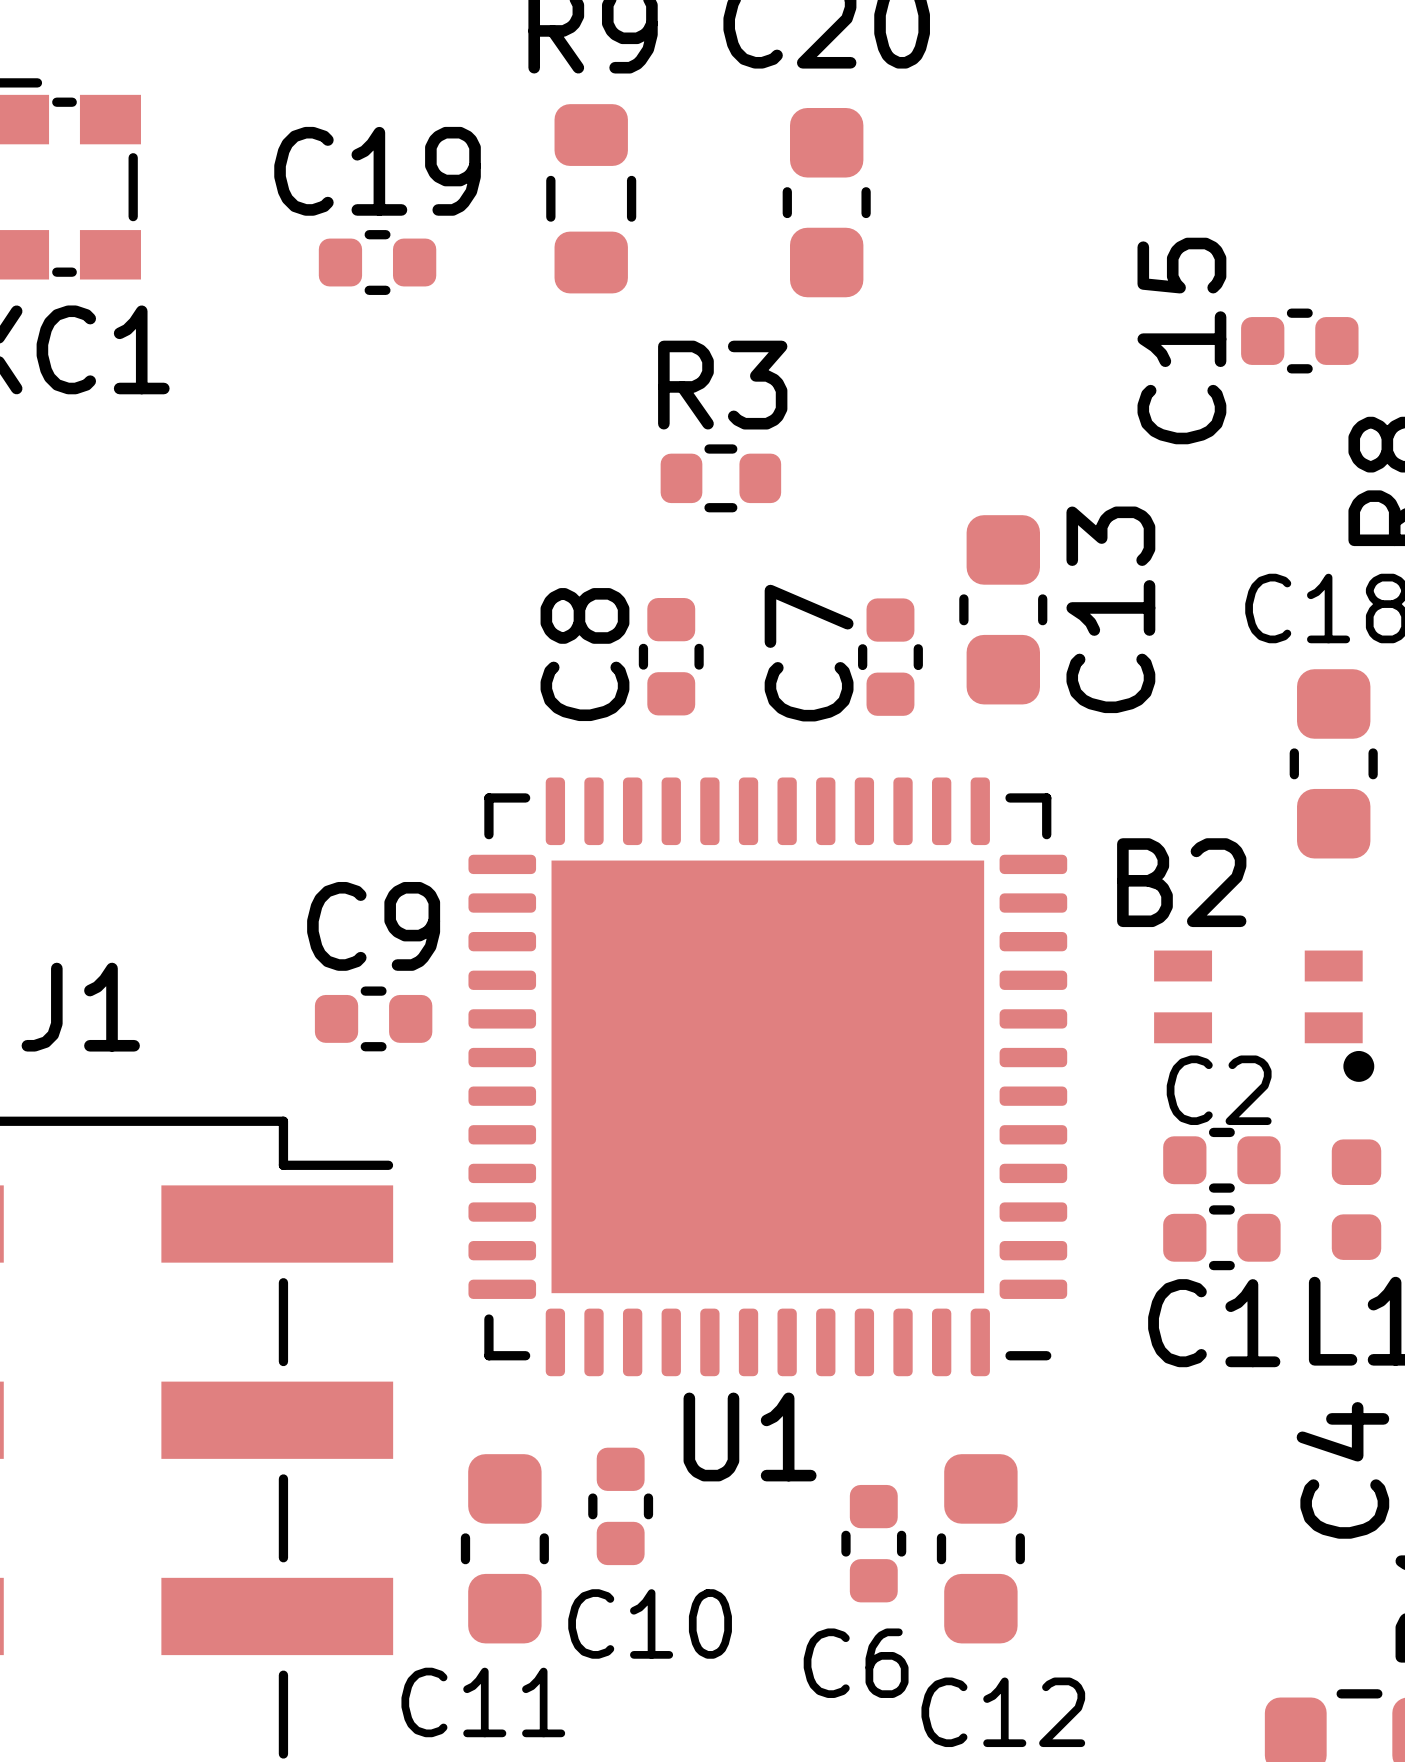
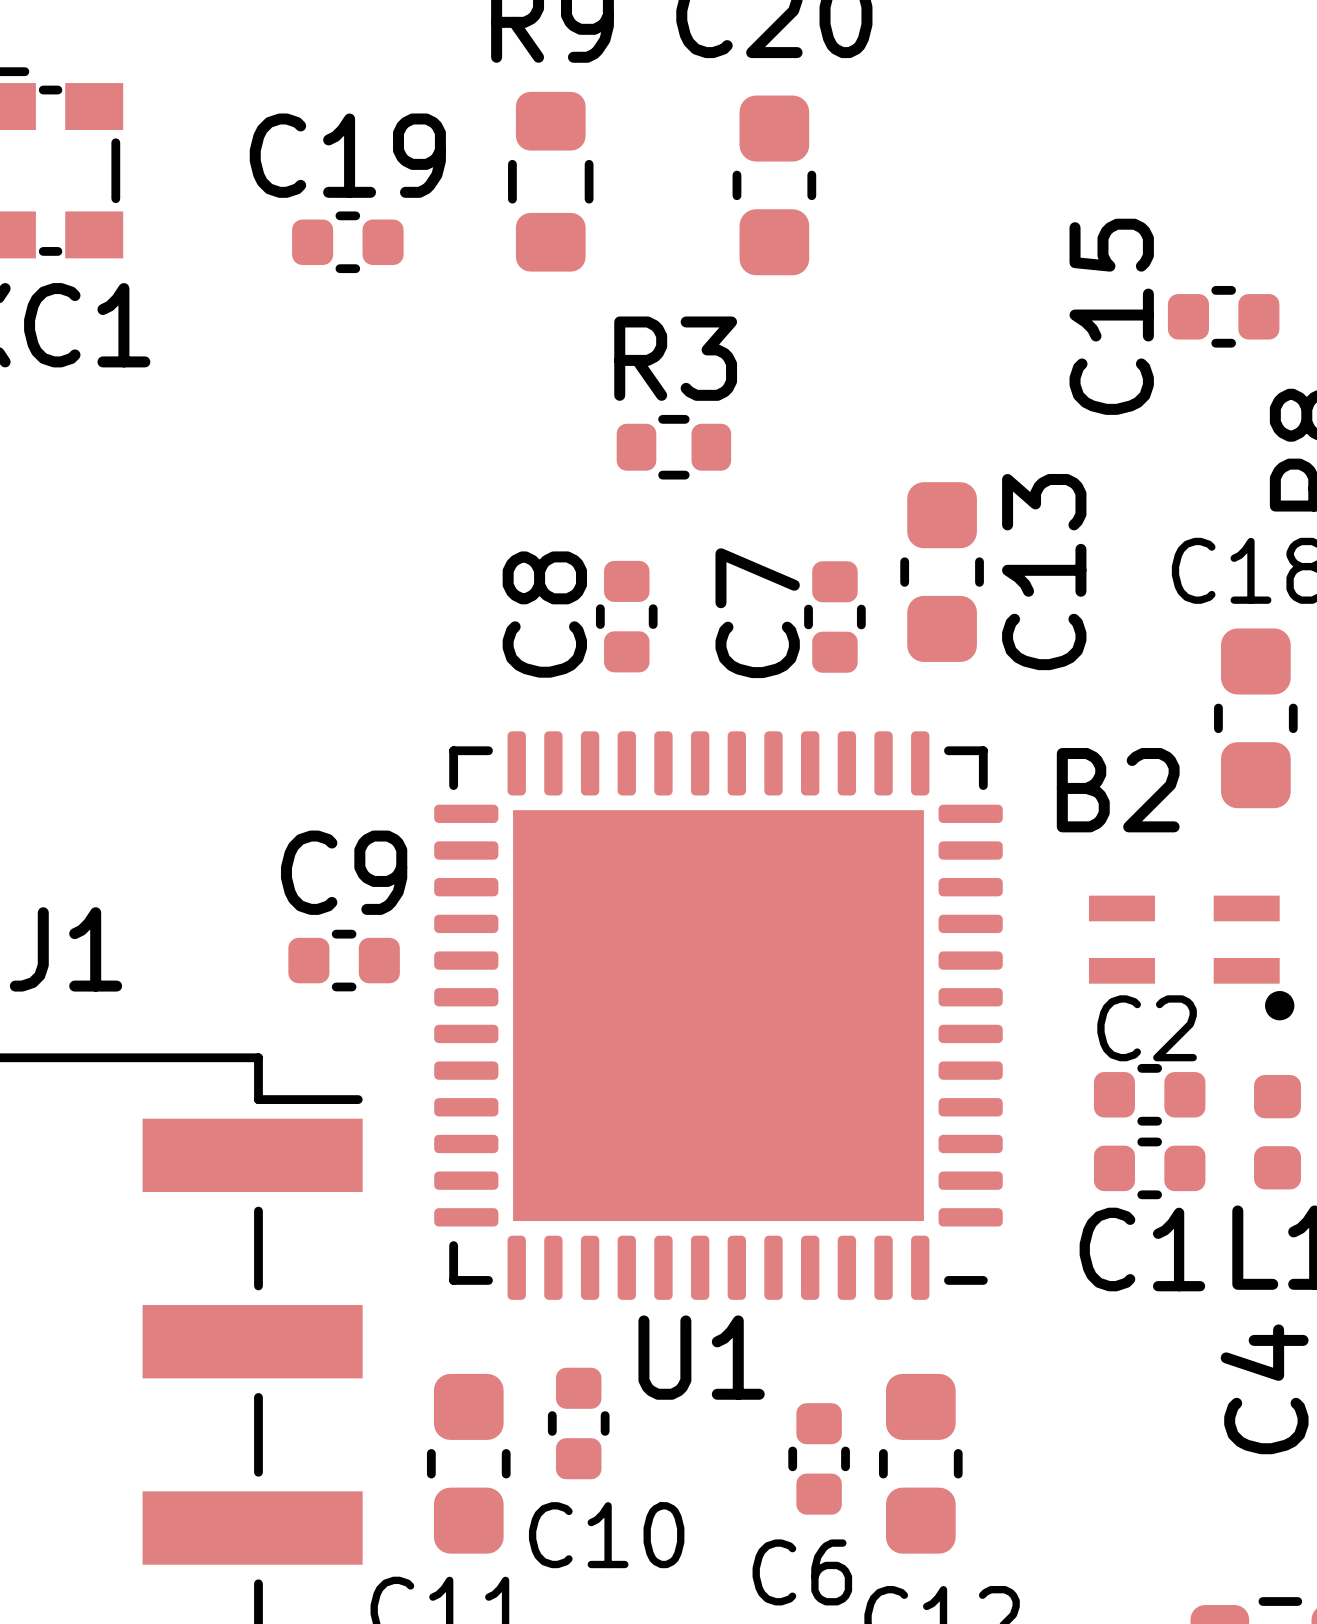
B2 name position: B2 (1181, 882) -> B2 (1118, 790)
B2 footprint: [1154, 950, 1375, 1082] -> [1088, 895, 1295, 1021]

